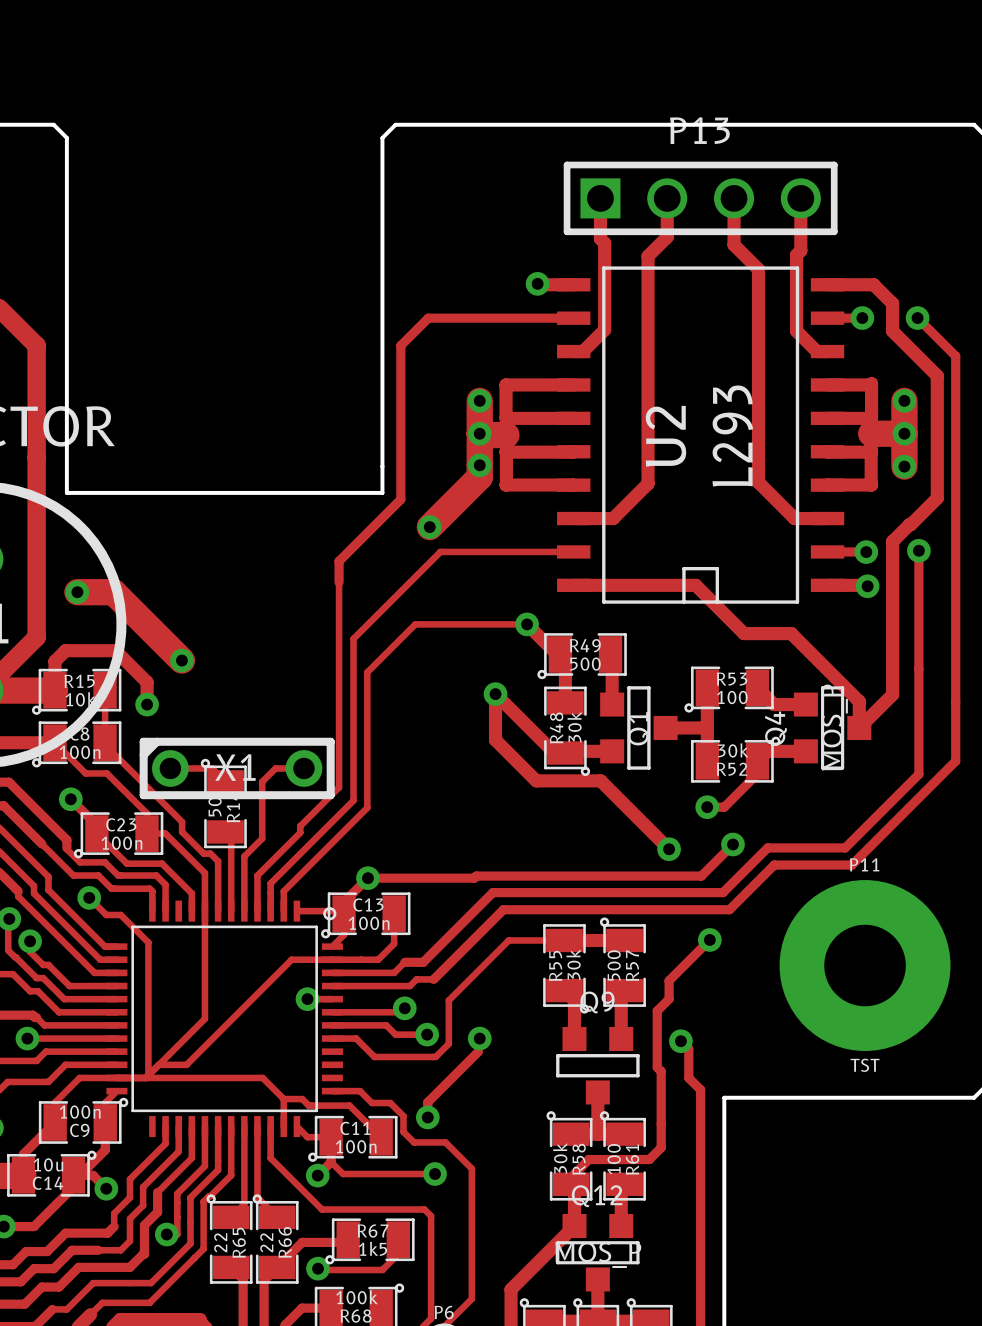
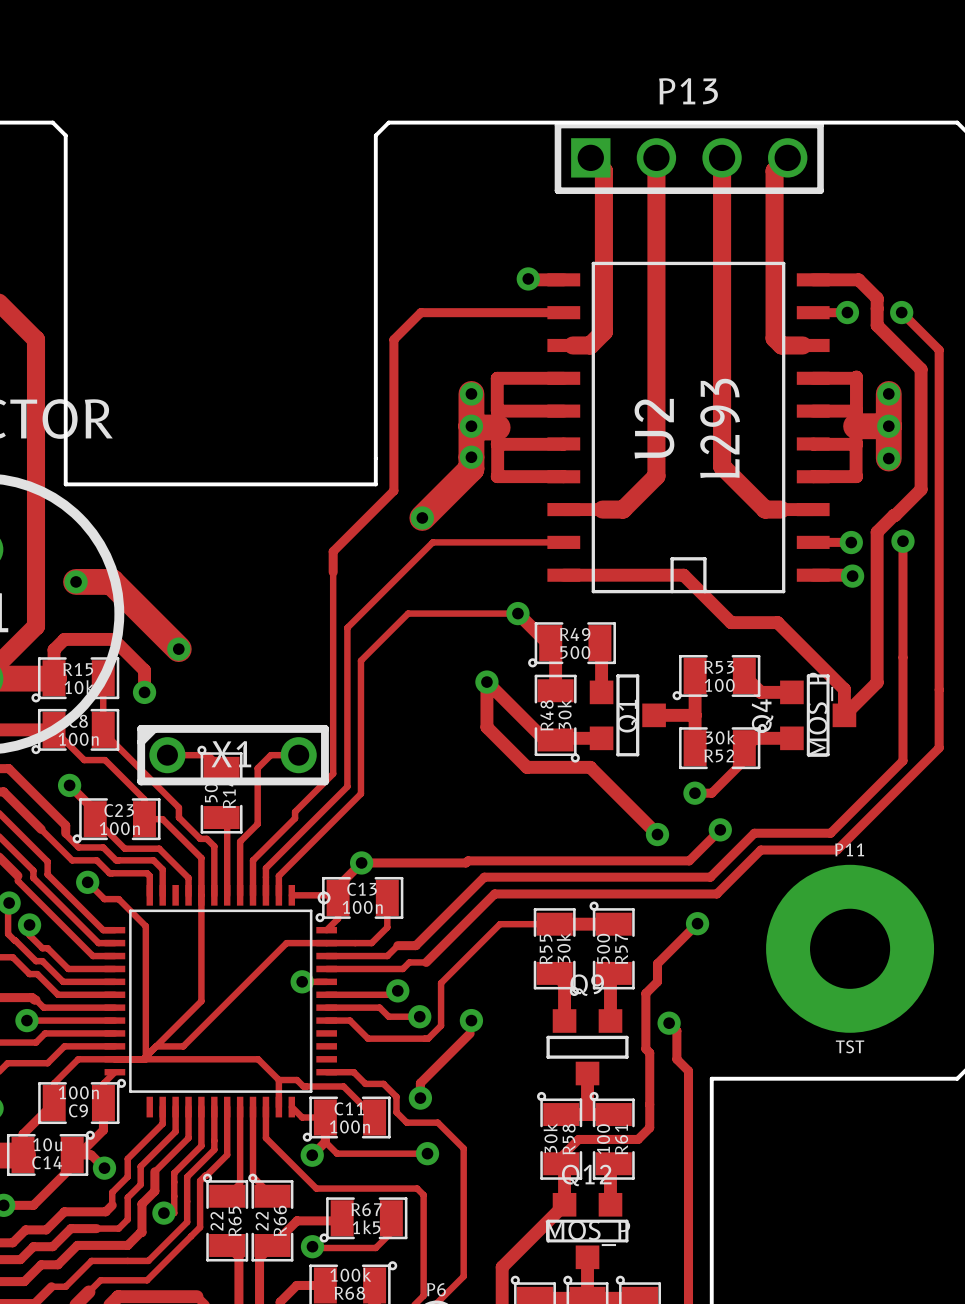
track: (600, 198) (600, 238) (604, 243) (604, 329) (582, 351) -> (590, 157) (603, 171) (603, 331) (590, 345) (572, 345)
track: (667, 198) (667, 237) (648, 256) (648, 483) (613, 518) -> (656, 157) (656, 476) (623, 509) (602, 509)
P13 position: (700, 198) -> (689, 157)
track: (734, 198) (734, 244) (758, 269) (758, 482) (794, 518) -> (722, 157) (722, 466) (765, 509) (780, 509)
track: (800, 198) (800, 250) (796, 254) (796, 331) (817, 351) -> (787, 157) (774, 171) (774, 338) (781, 345) (802, 345)

